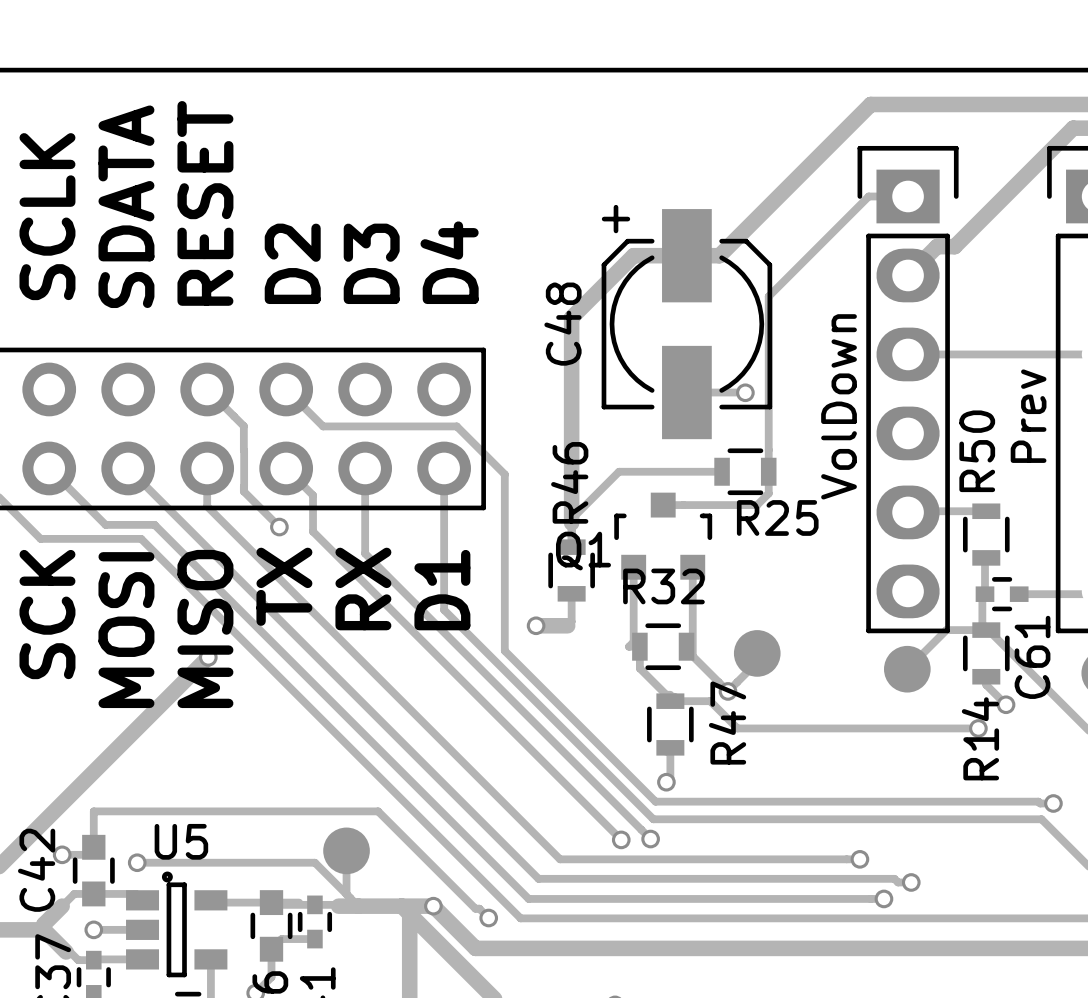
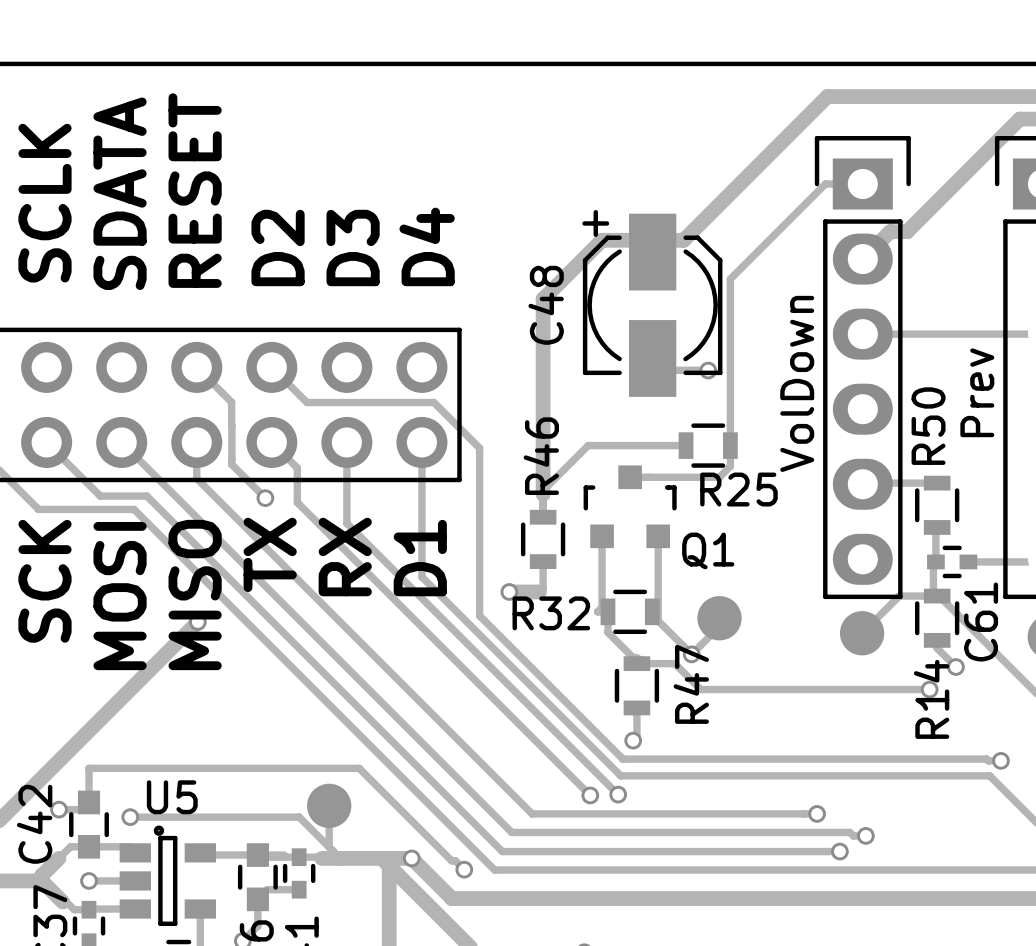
C48 footprint: [601, 209, 773, 440] -> [582, 213, 723, 397]
Q1 name position: Q1 (583, 551) -> Q1 (708, 550)
R32 name position: R32 (663, 586) -> R32 (551, 613)

